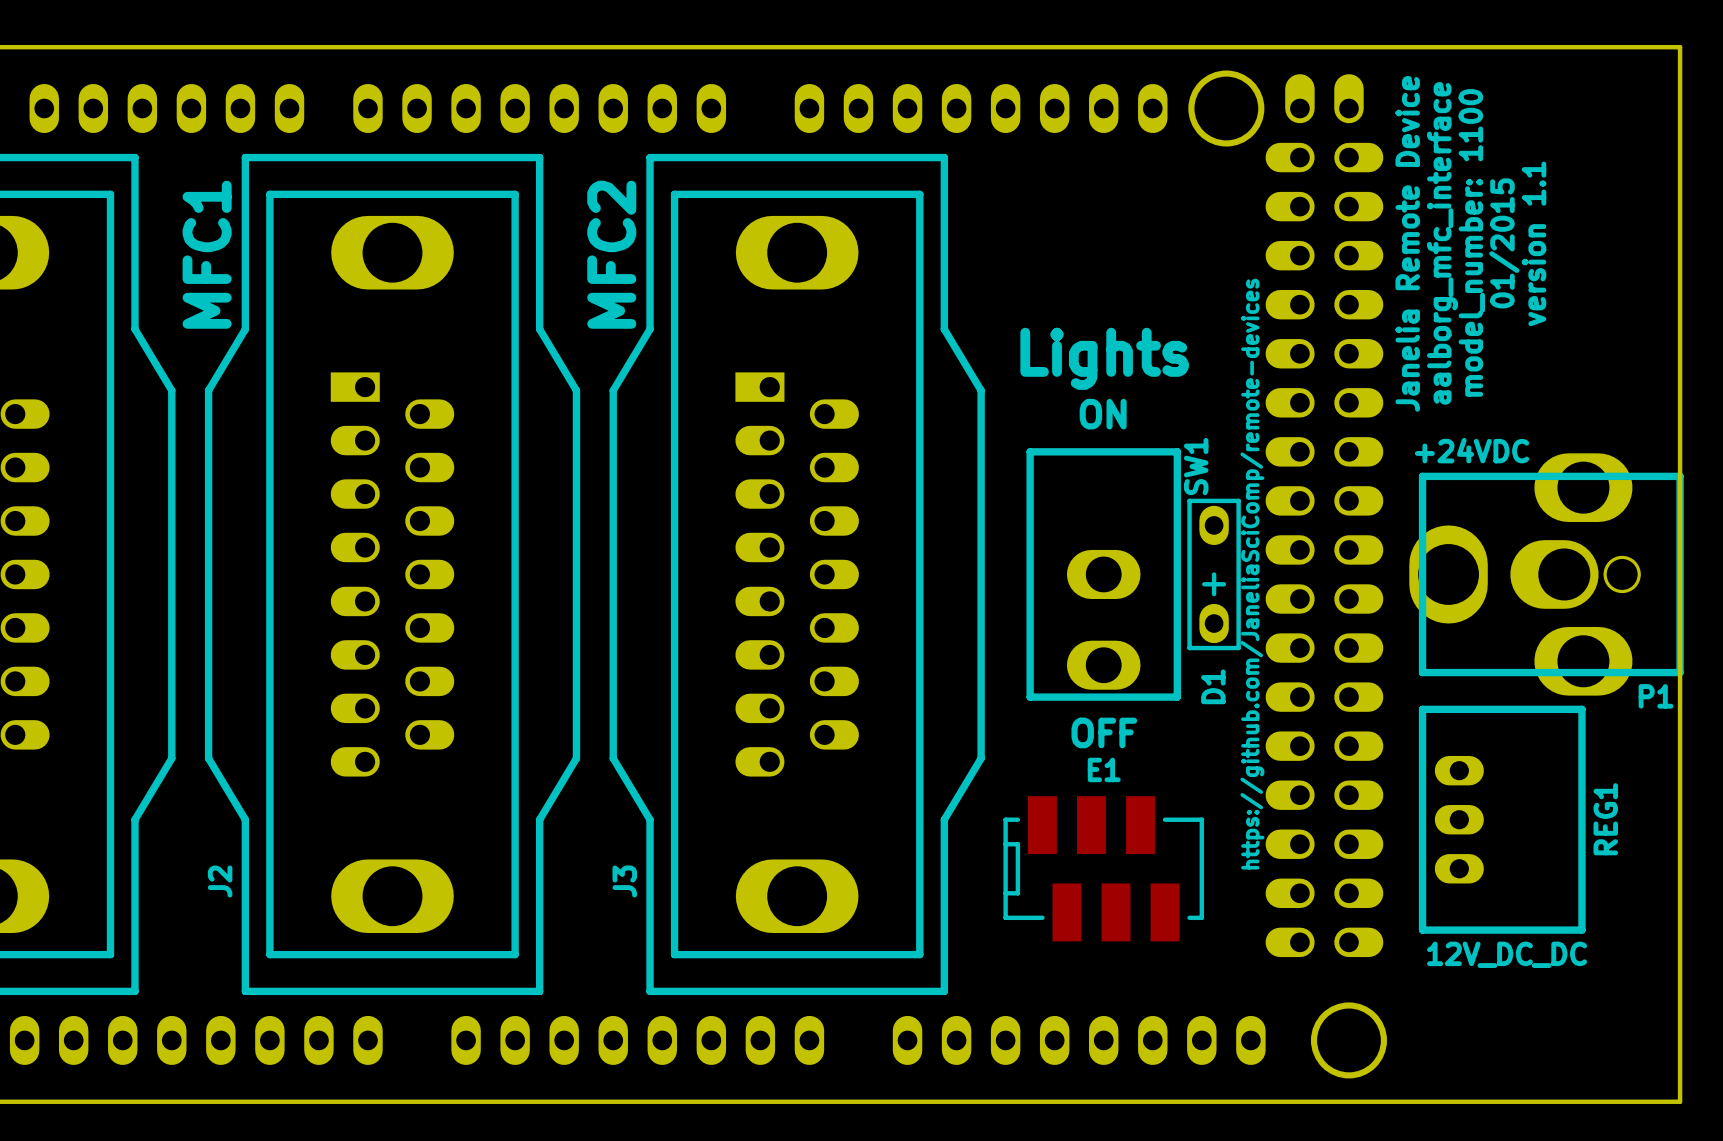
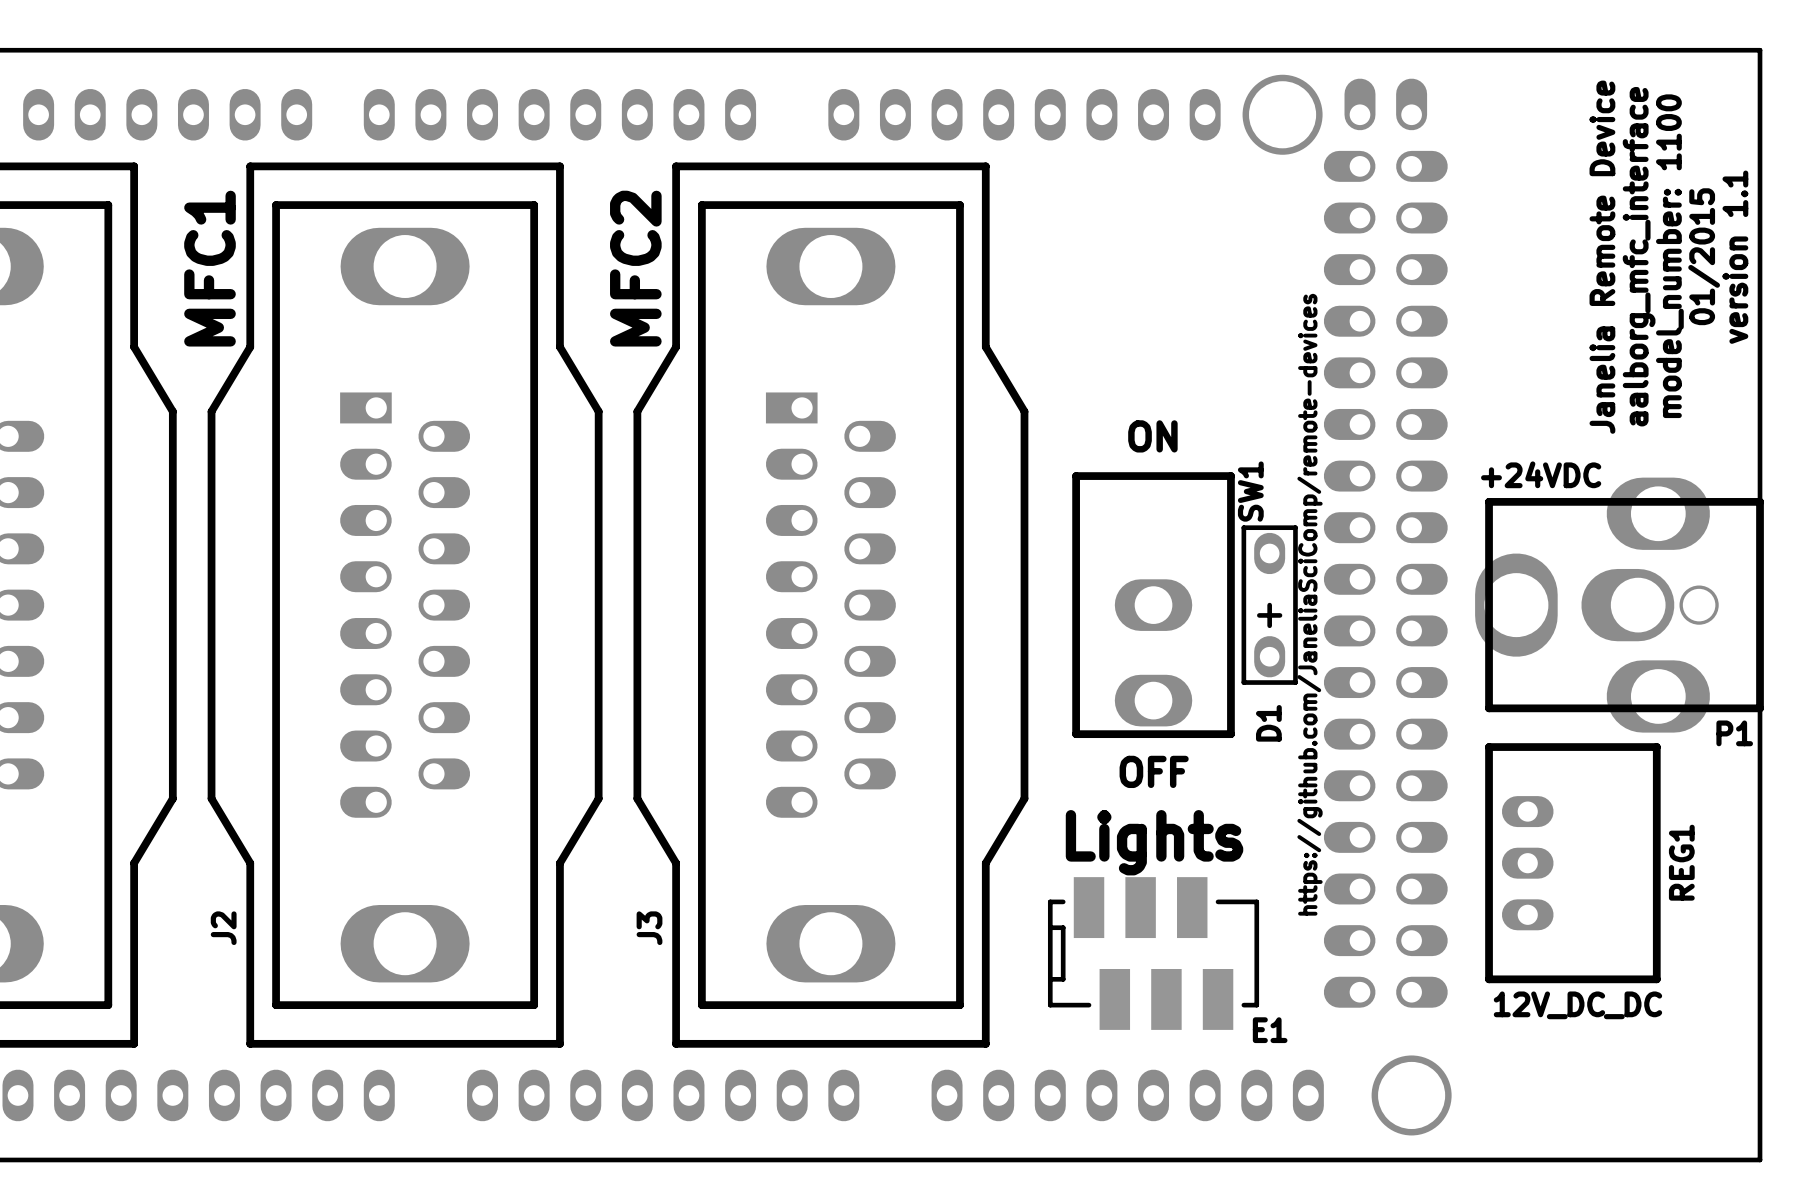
text position: model_number: 1100 (1471, 242) -> model_number: 1100 (1669, 256)
text: Janelia Remote Device (1407, 243) -> none
text position: aalborg_mfc_interface (1442, 243) -> aalborg_mfc_interface (1639, 256)
text position: 01/2015 (1504, 243) -> 01/2015 (1704, 256)
text: version 1.1 (1534, 243) -> Janelia Remote Device (1602, 257)
text: none -> version 1.1 (1735, 257)
SW1 text position: Lights (1104, 358) -> Lights (1154, 842)
E1 name position: E1 (1104, 769) -> E1 (1270, 1030)
E1 position: (1103, 868) -> (1153, 953)

